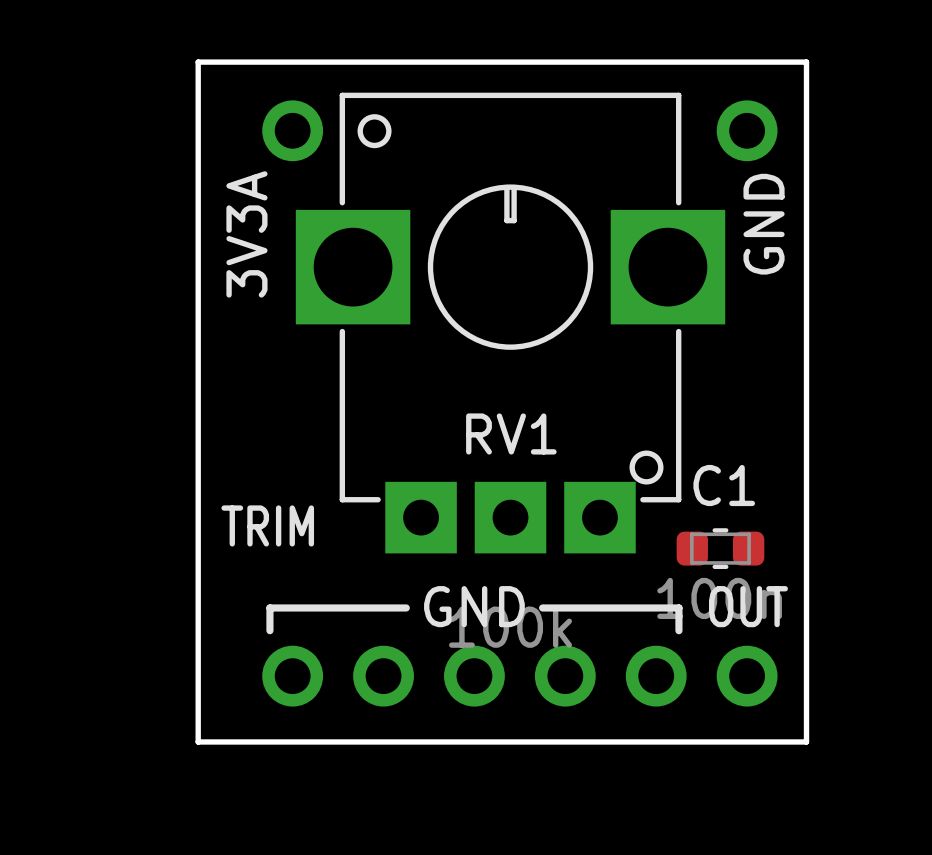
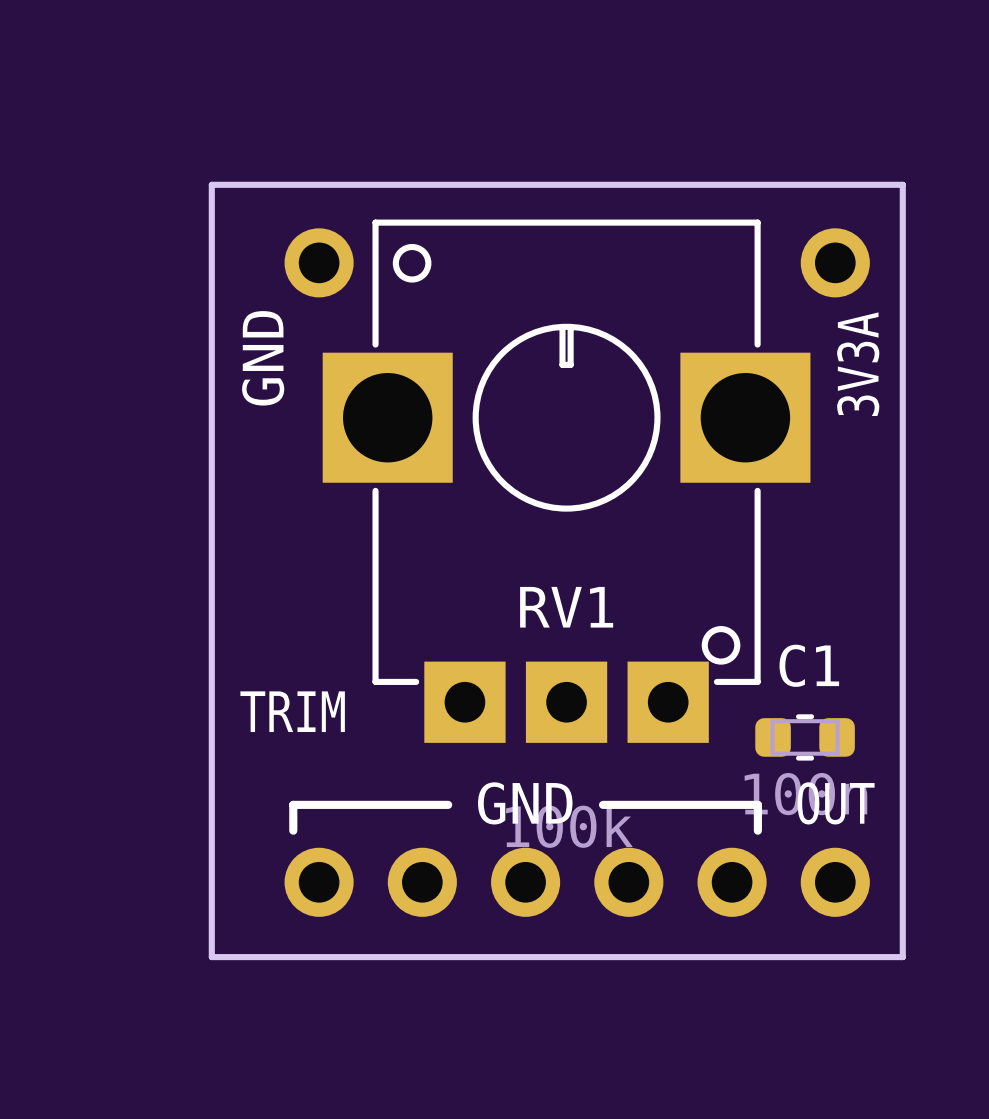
text: GND (764, 224) -> 3V3A (858, 364)
text: 3V3A (246, 234) -> GND (263, 358)

